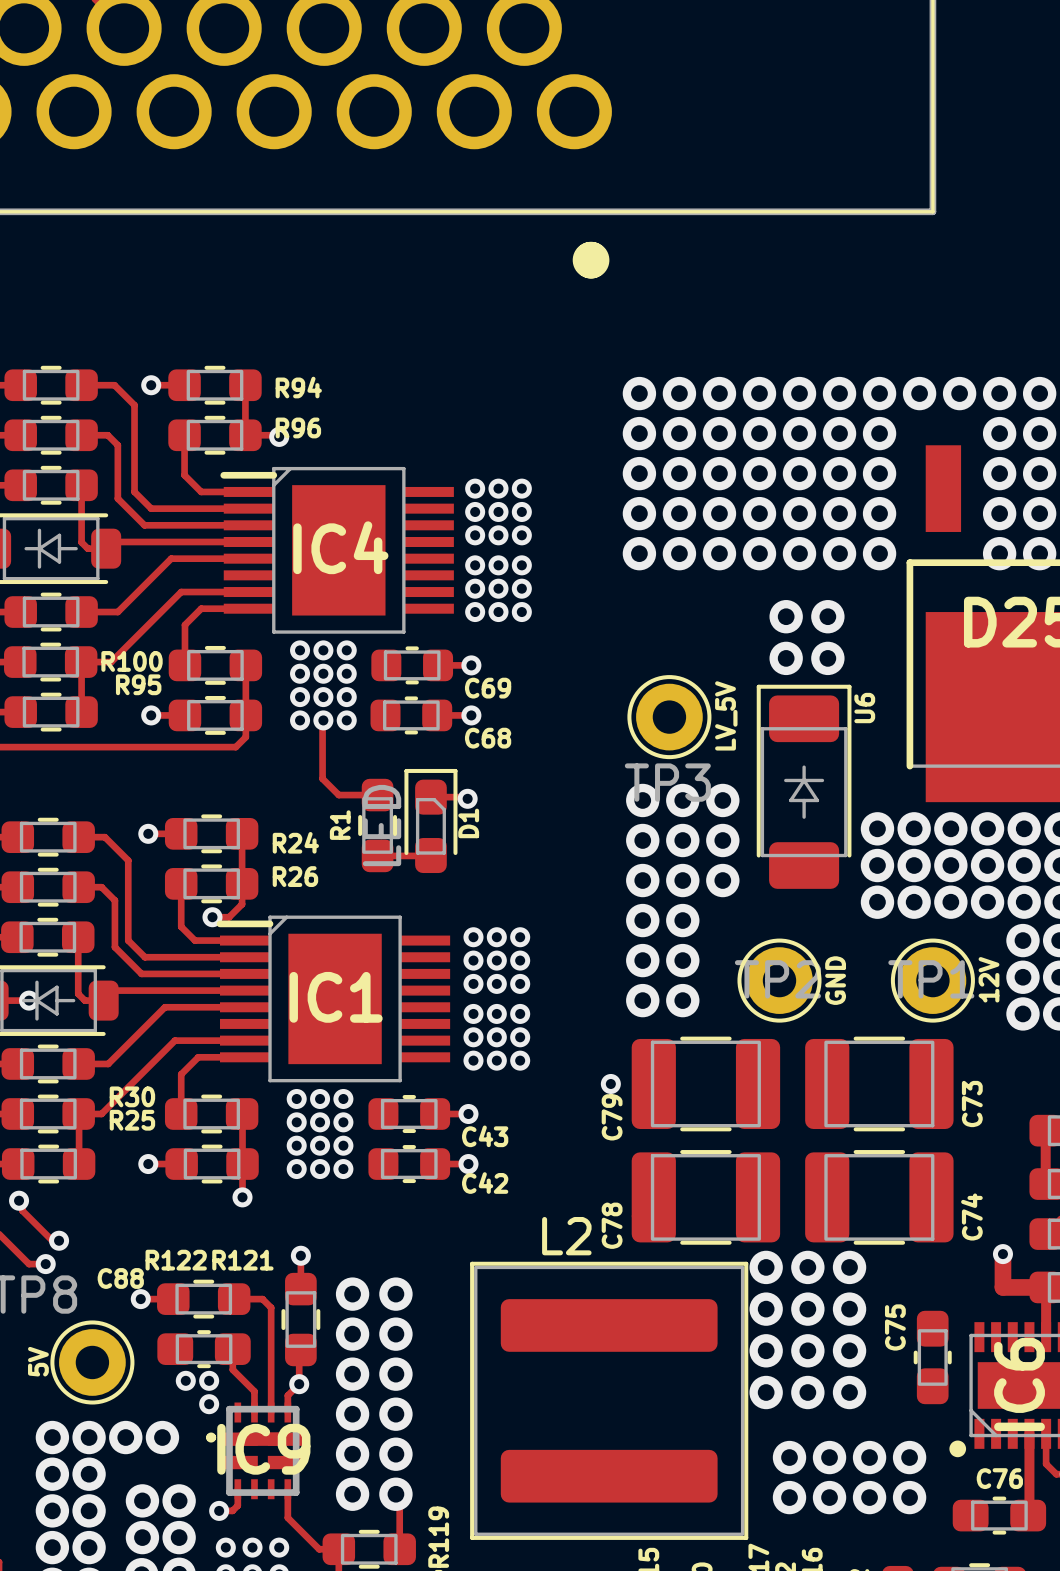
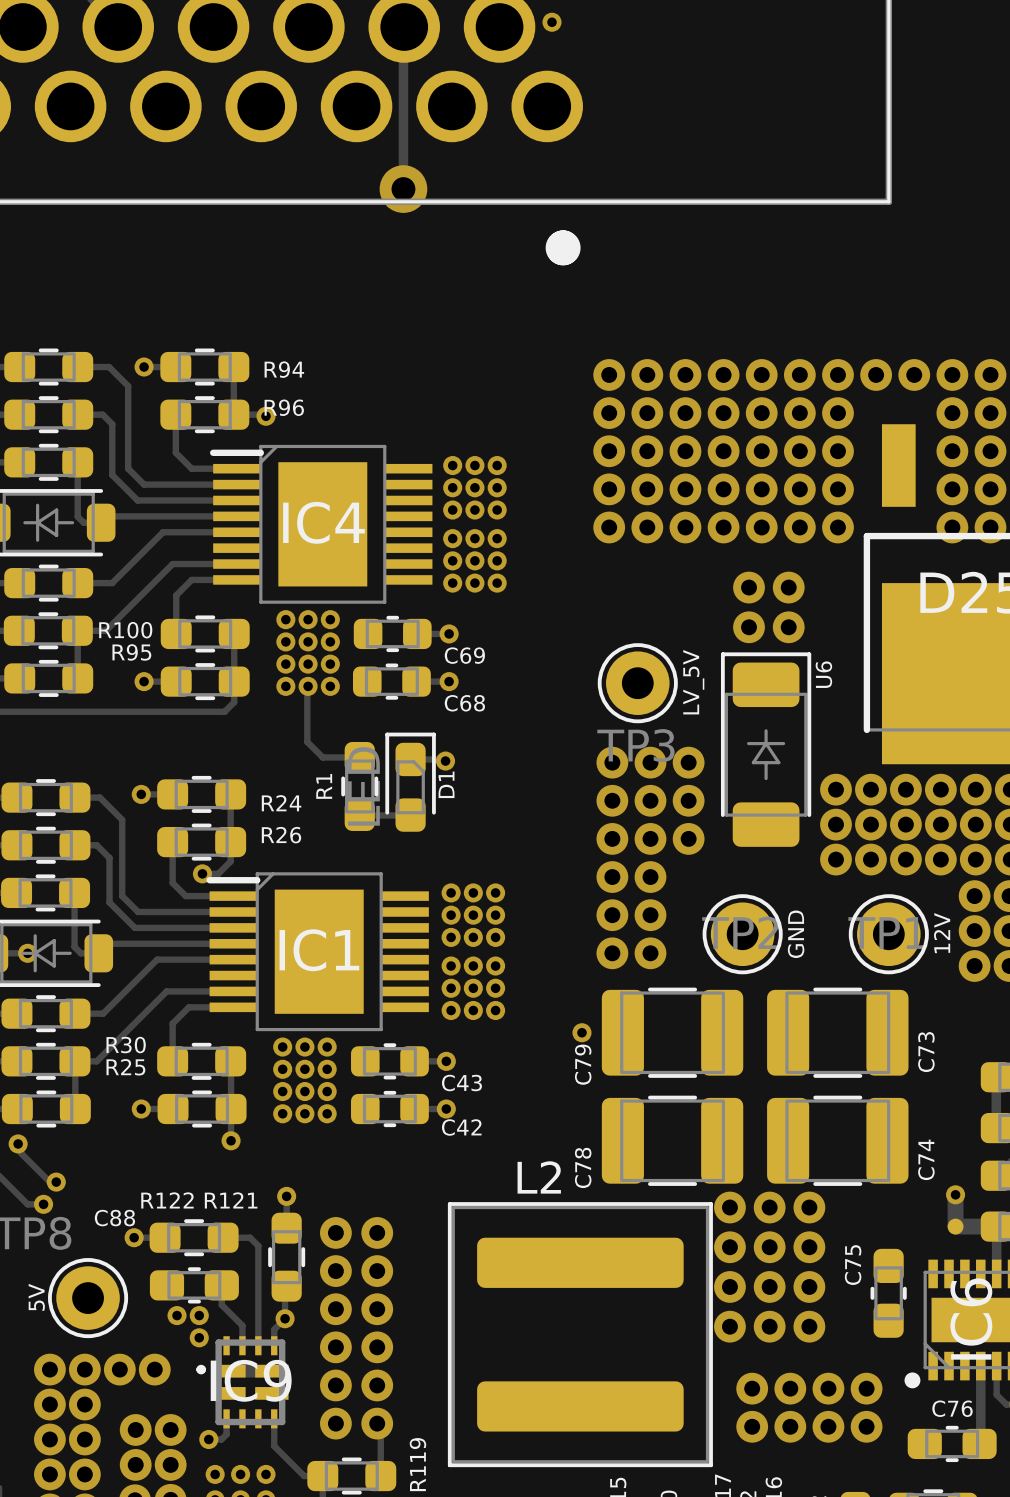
via: none -> (551, 22)
track: none -> (403, 24) (403, 189)
via: none -> (403, 189)

